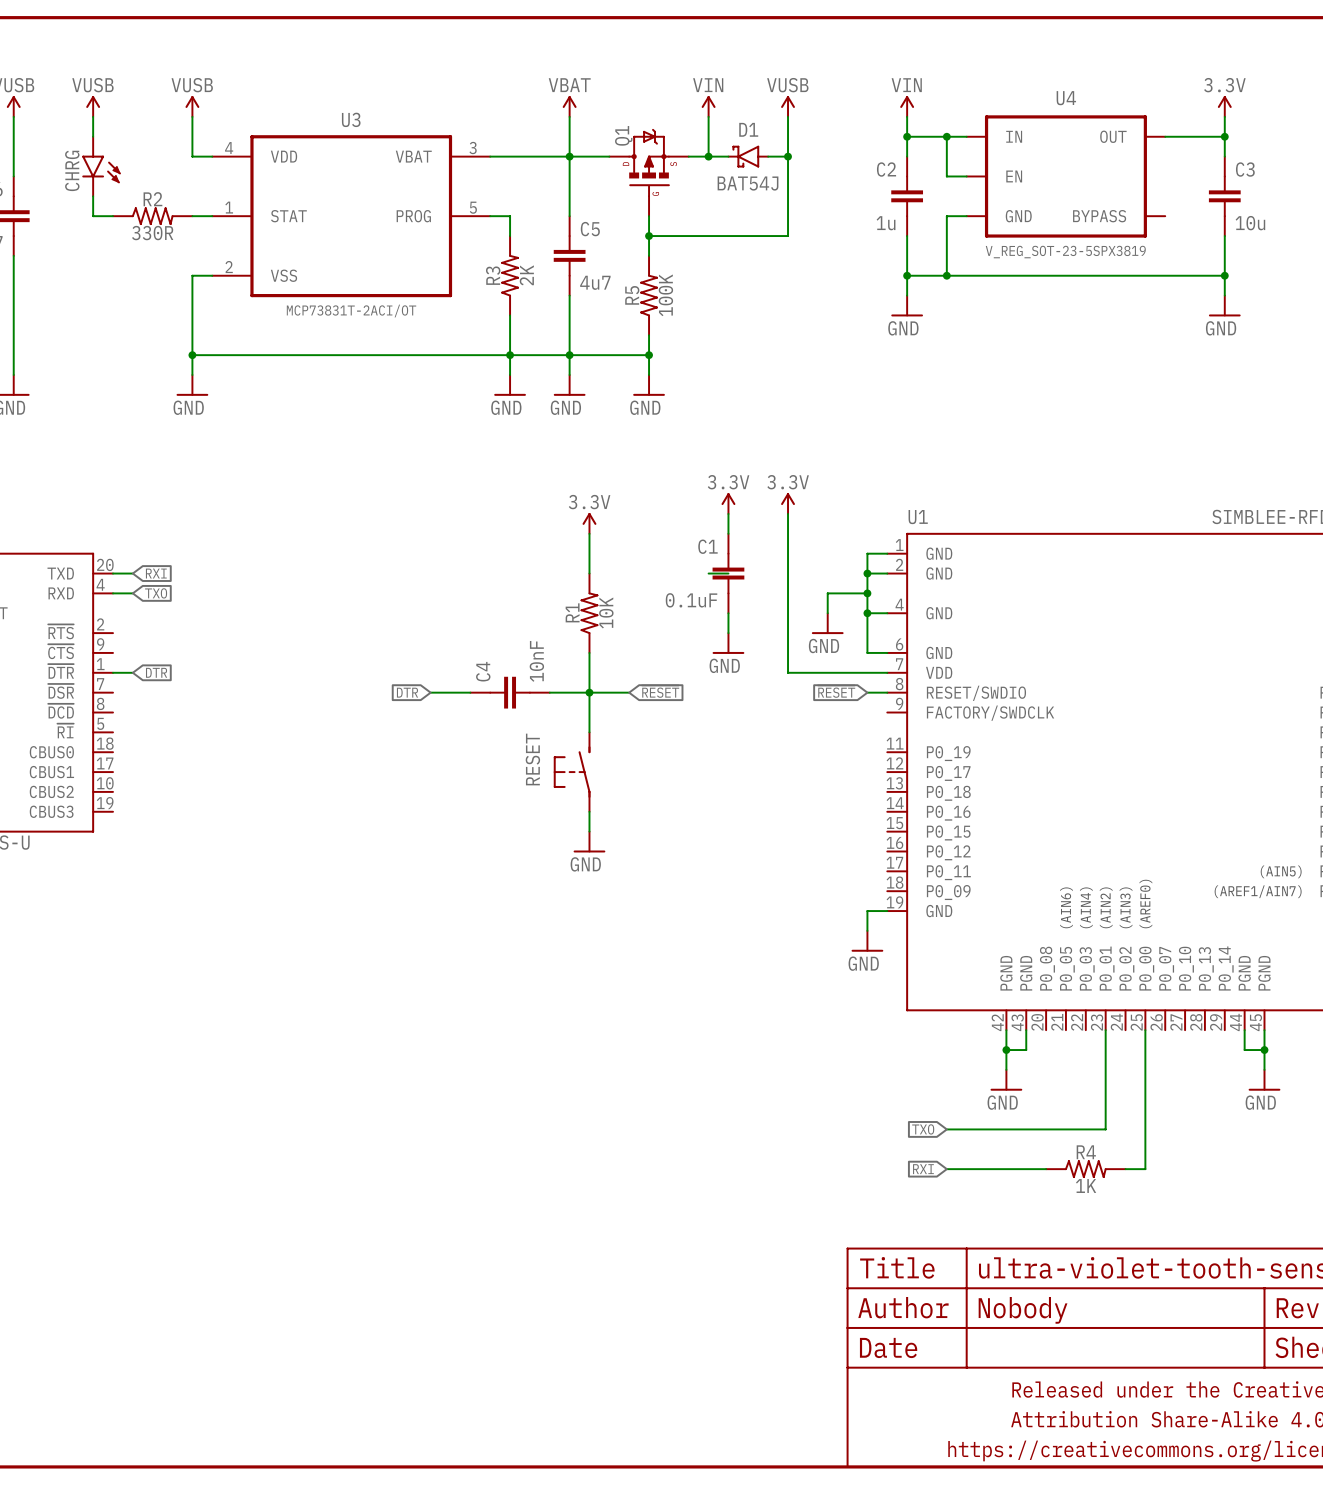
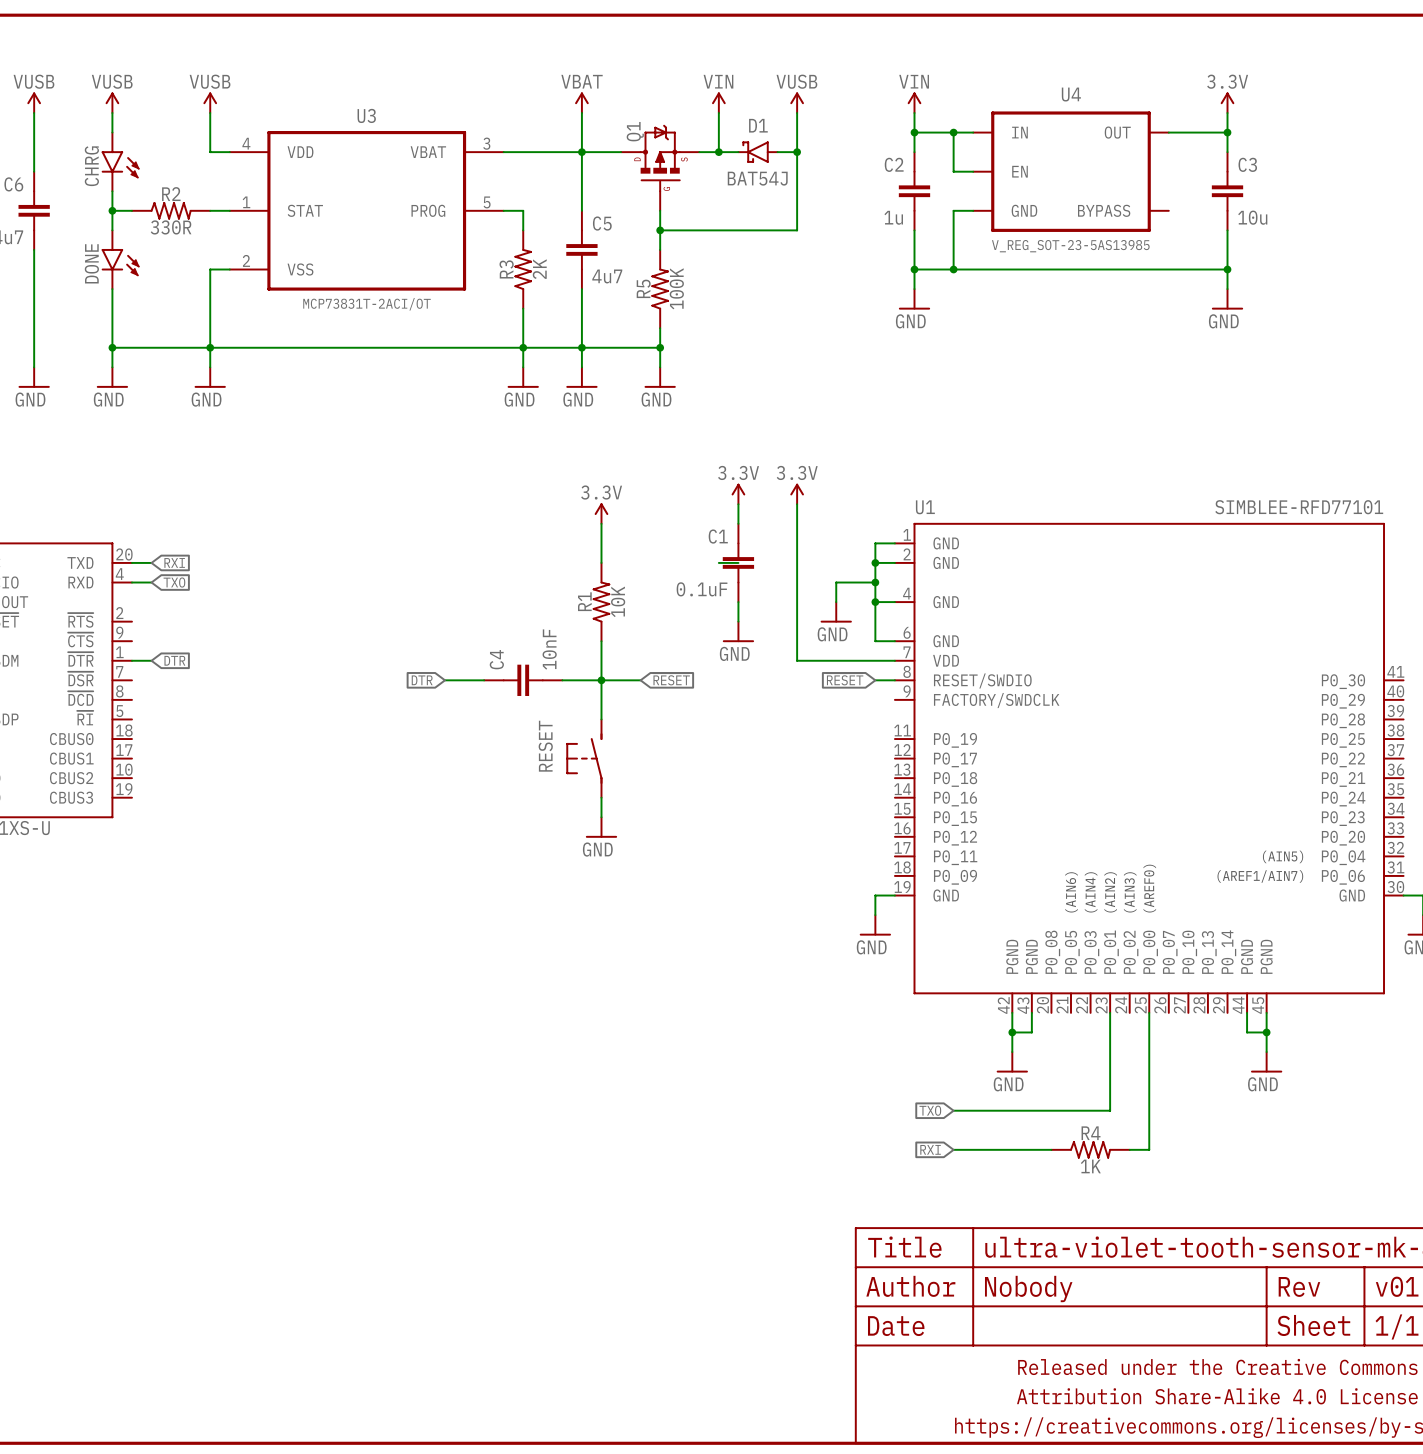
wire: none -> (112, 210) (112, 230)
junction: none -> (112, 210)
U4 value: V_REG_SOT-23-5SPX3819 (1065, 252) -> V_REG_SOT-23-5AS13985 (1070, 246)
DONE: none -> (120, 259)
wire: none -> (112, 289) (112, 367)
wire: none -> (112, 347) (210, 347)
junction: none -> (112, 347)
power symbol: none -> GND (112, 377)

